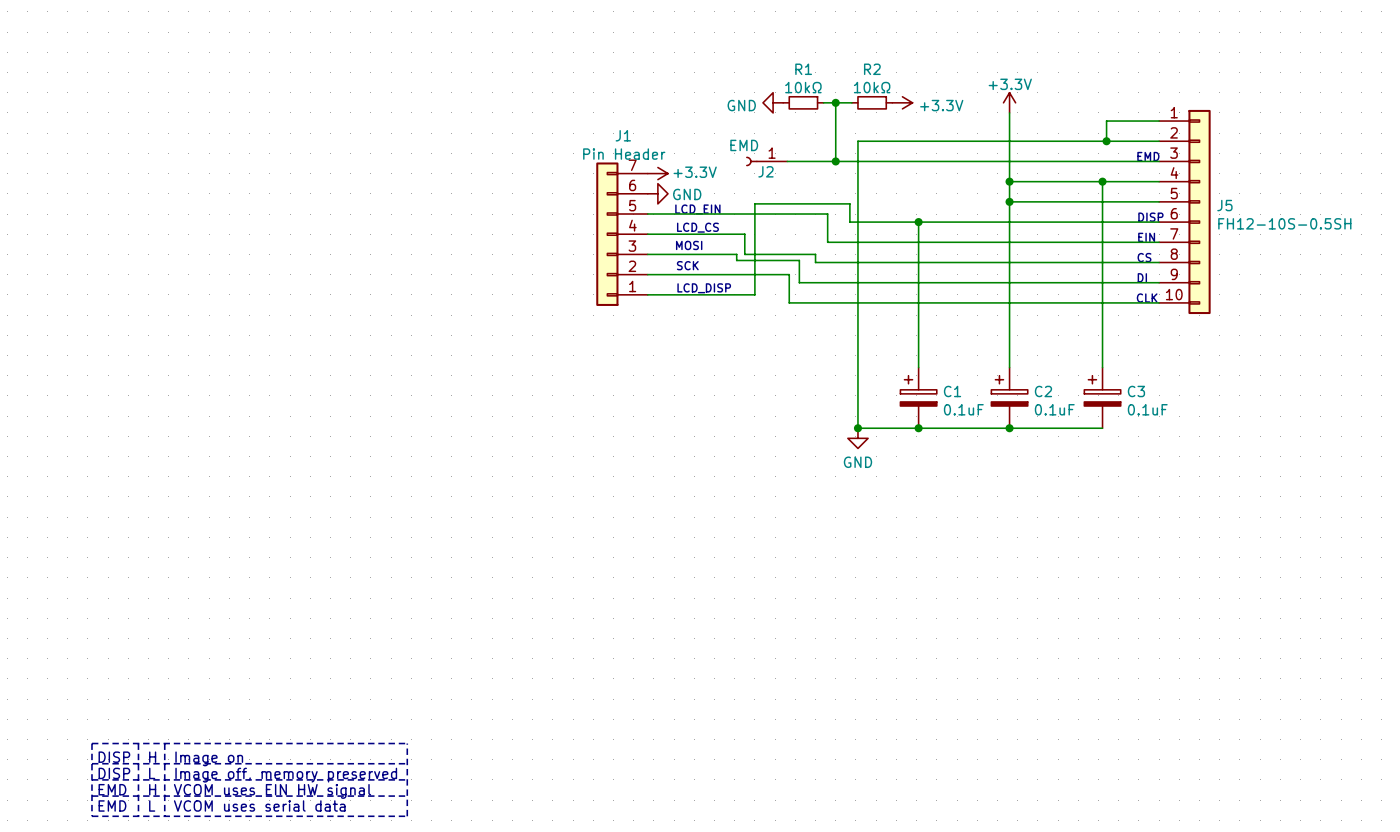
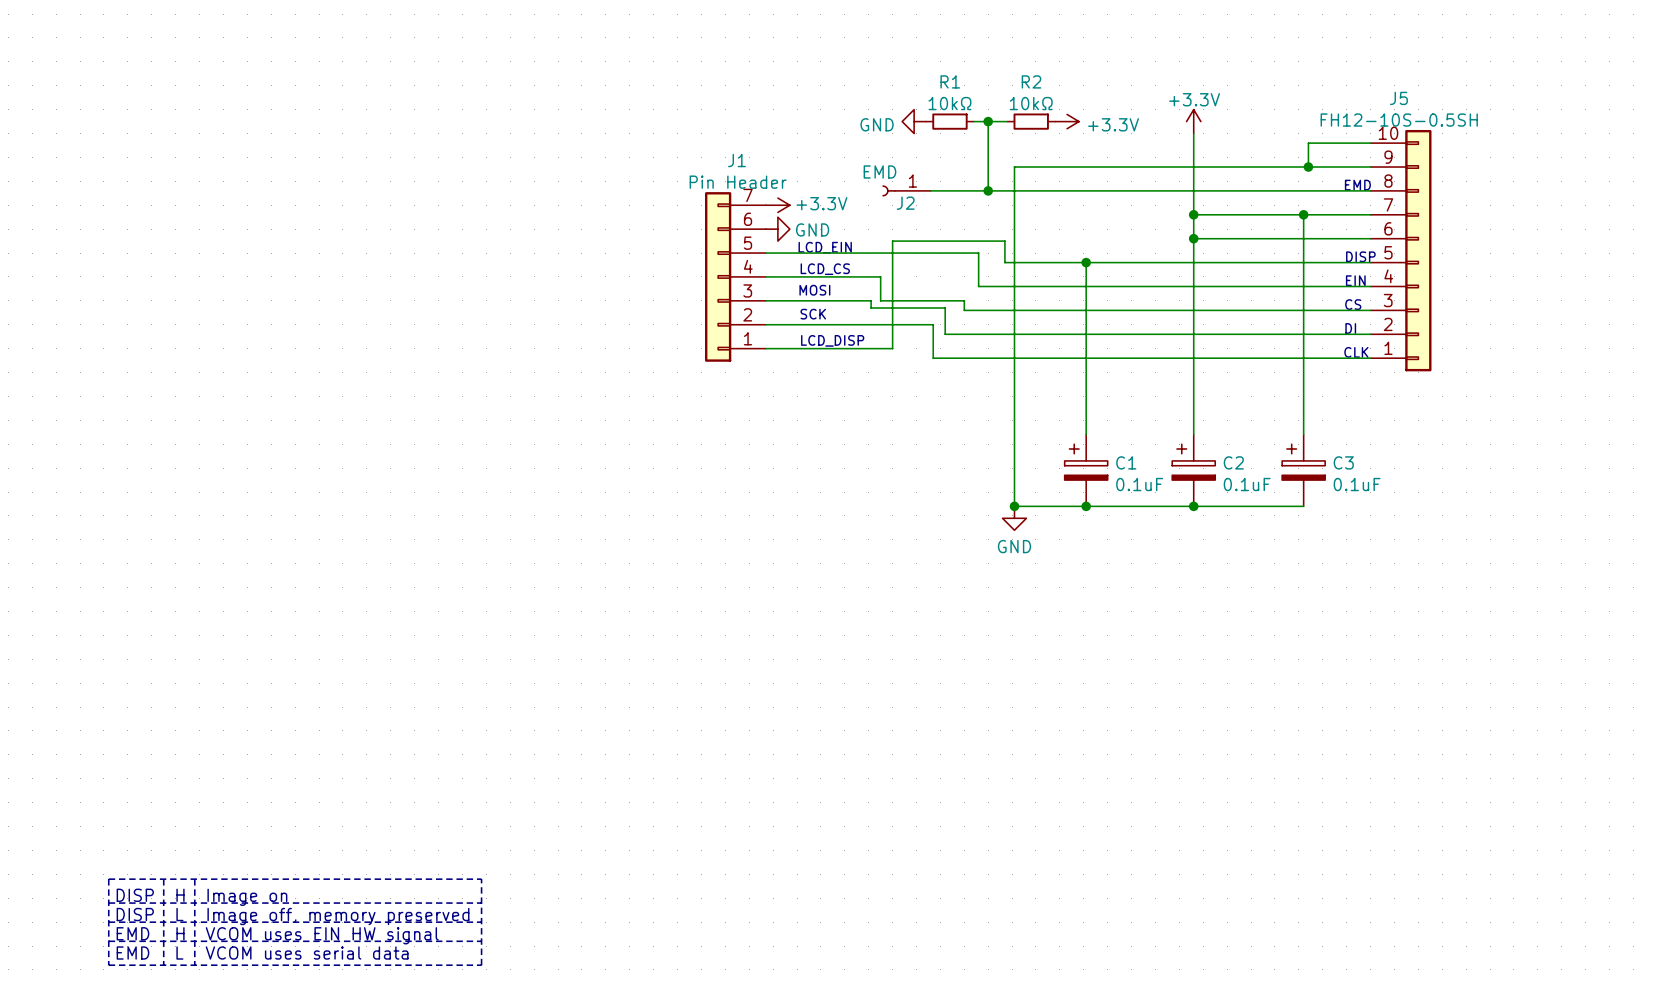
J5 name position: J5 (1224, 205) -> J5 (1398, 98)
J5 flip: as is (1199, 211) -> up-down (1418, 250)
J5 value position: FH12-10S-0.5SH (1284, 223) -> FH12-10S-0.5SH (1399, 120)

